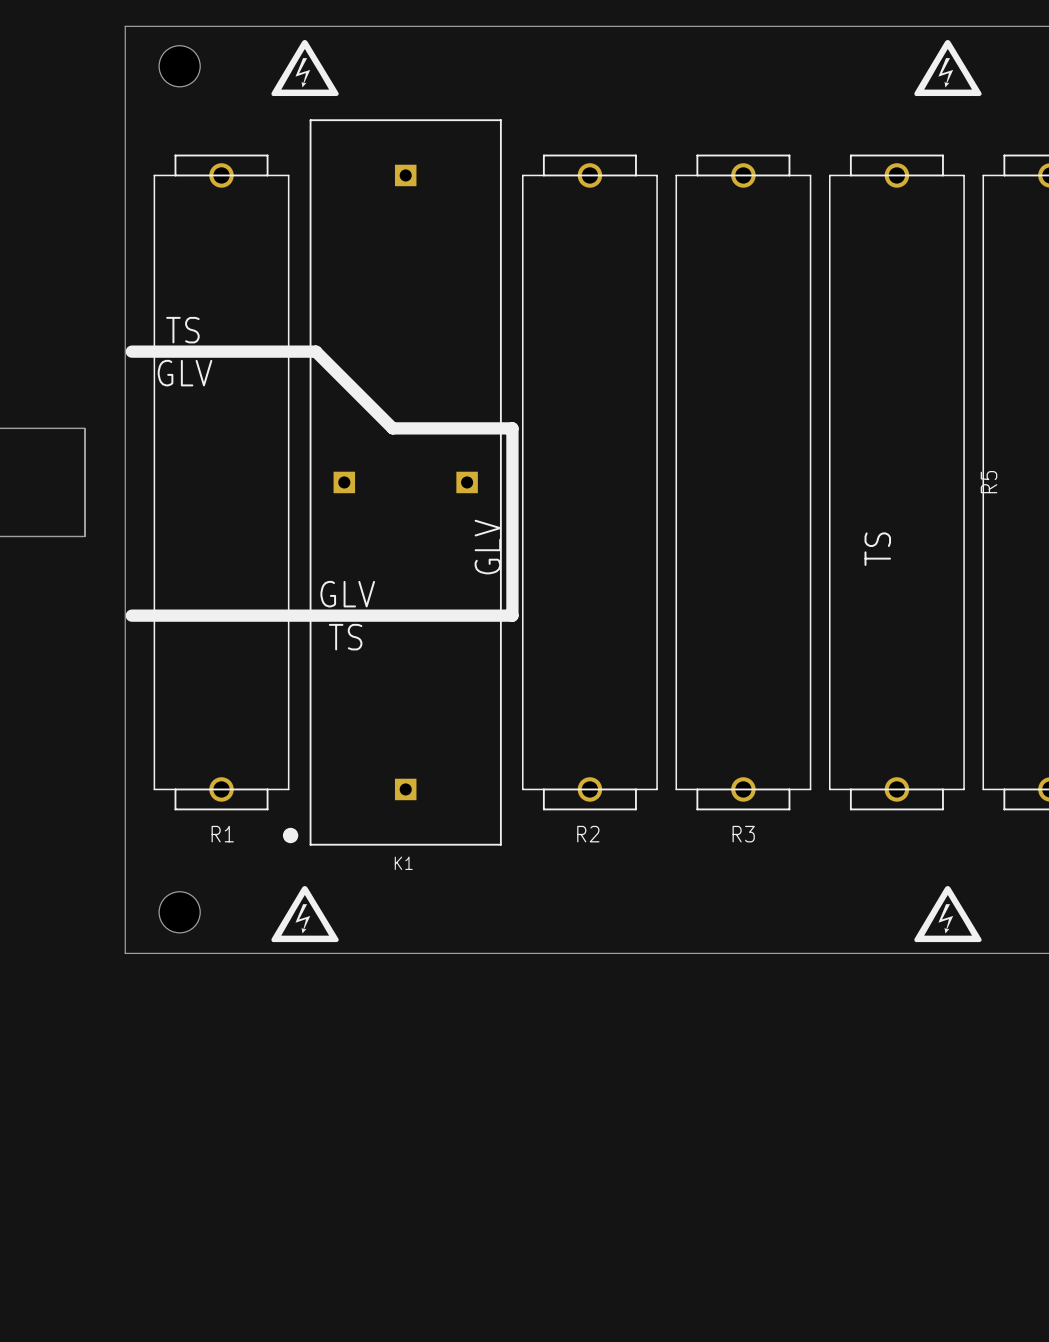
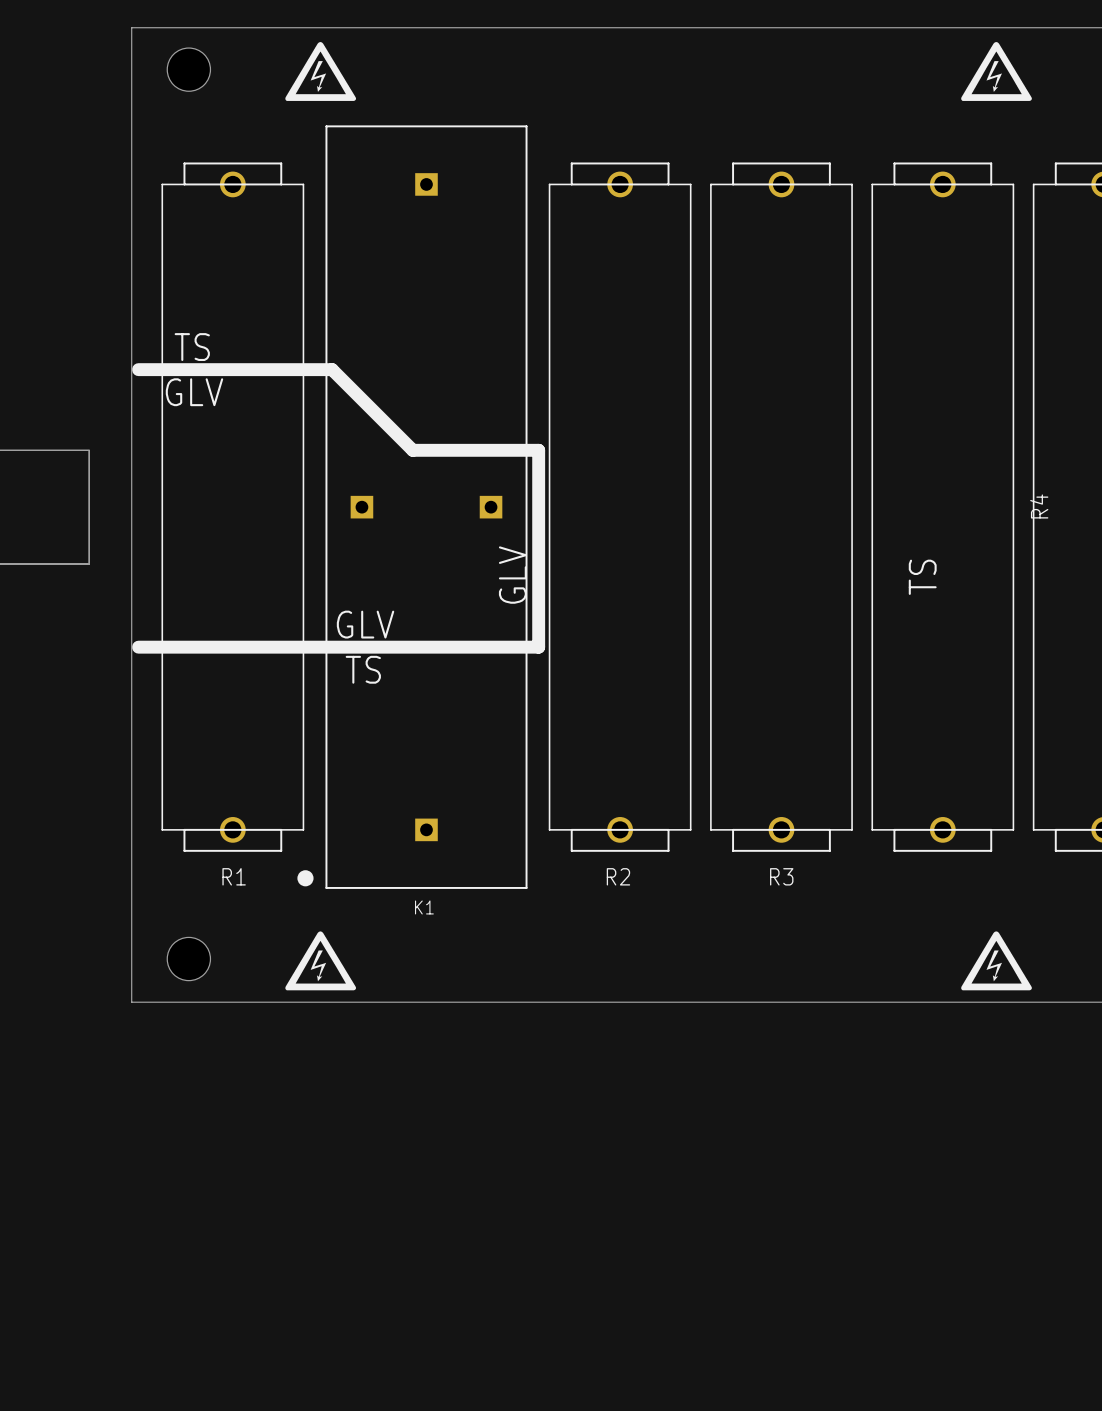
R5 name: R5 (989, 482) -> R4 (1039, 506)

